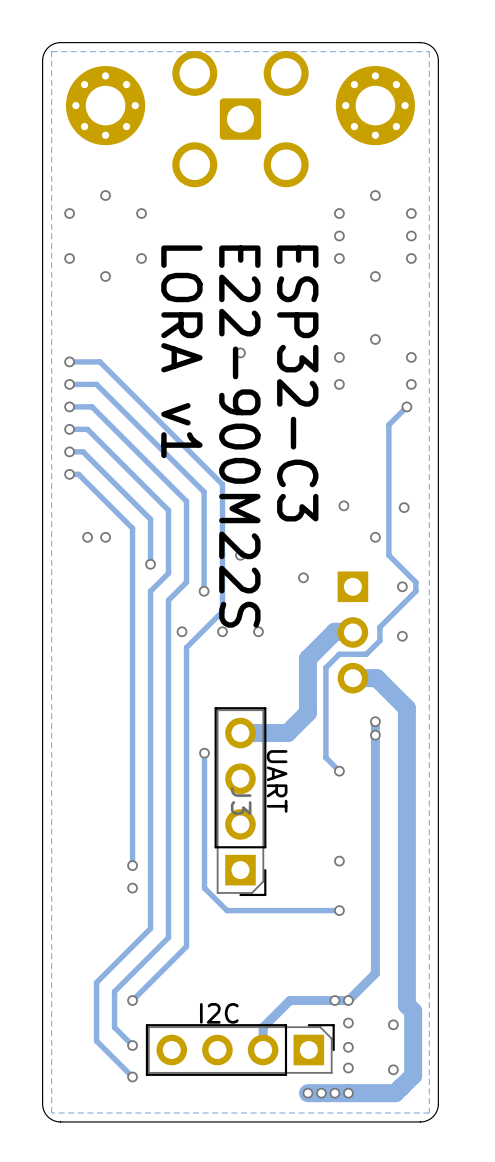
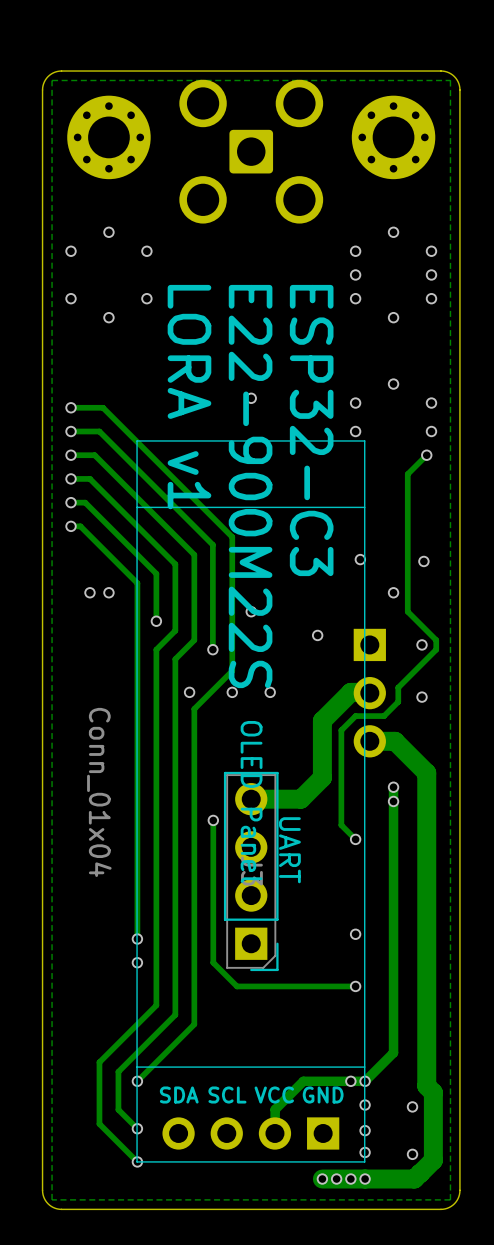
part: none -> Conn_01x04 (250, 801)
part: I2C (240, 1050) -> none

